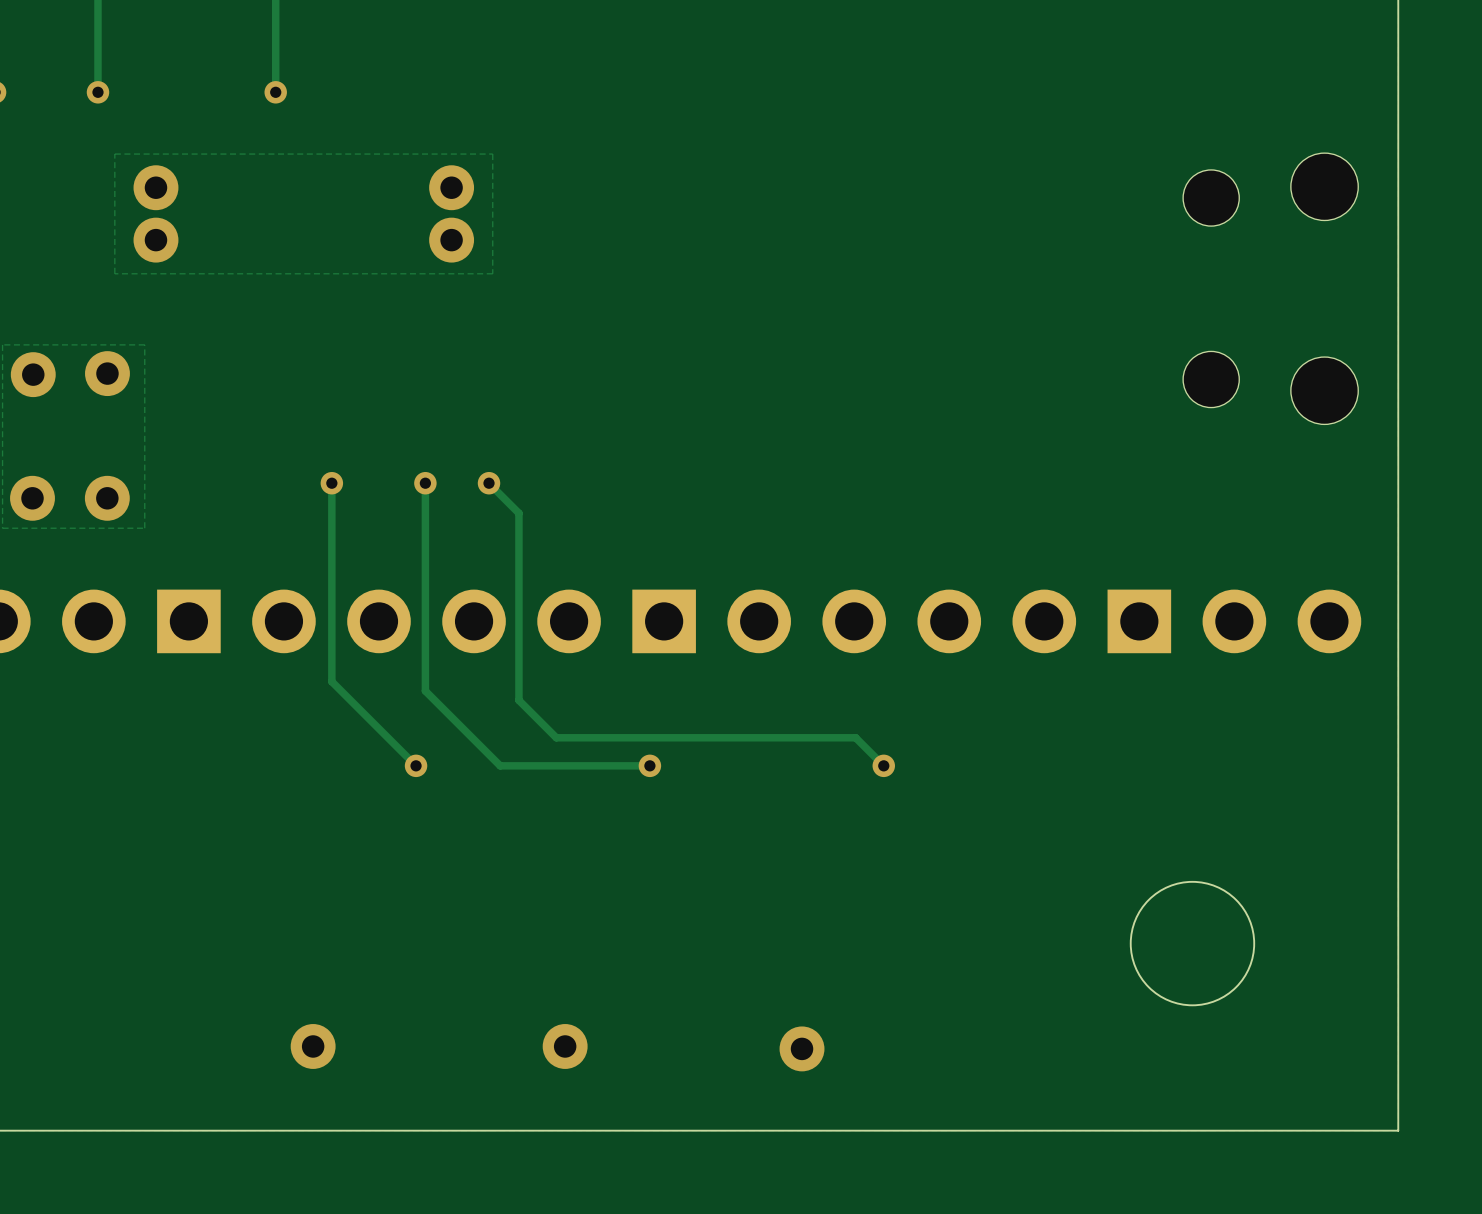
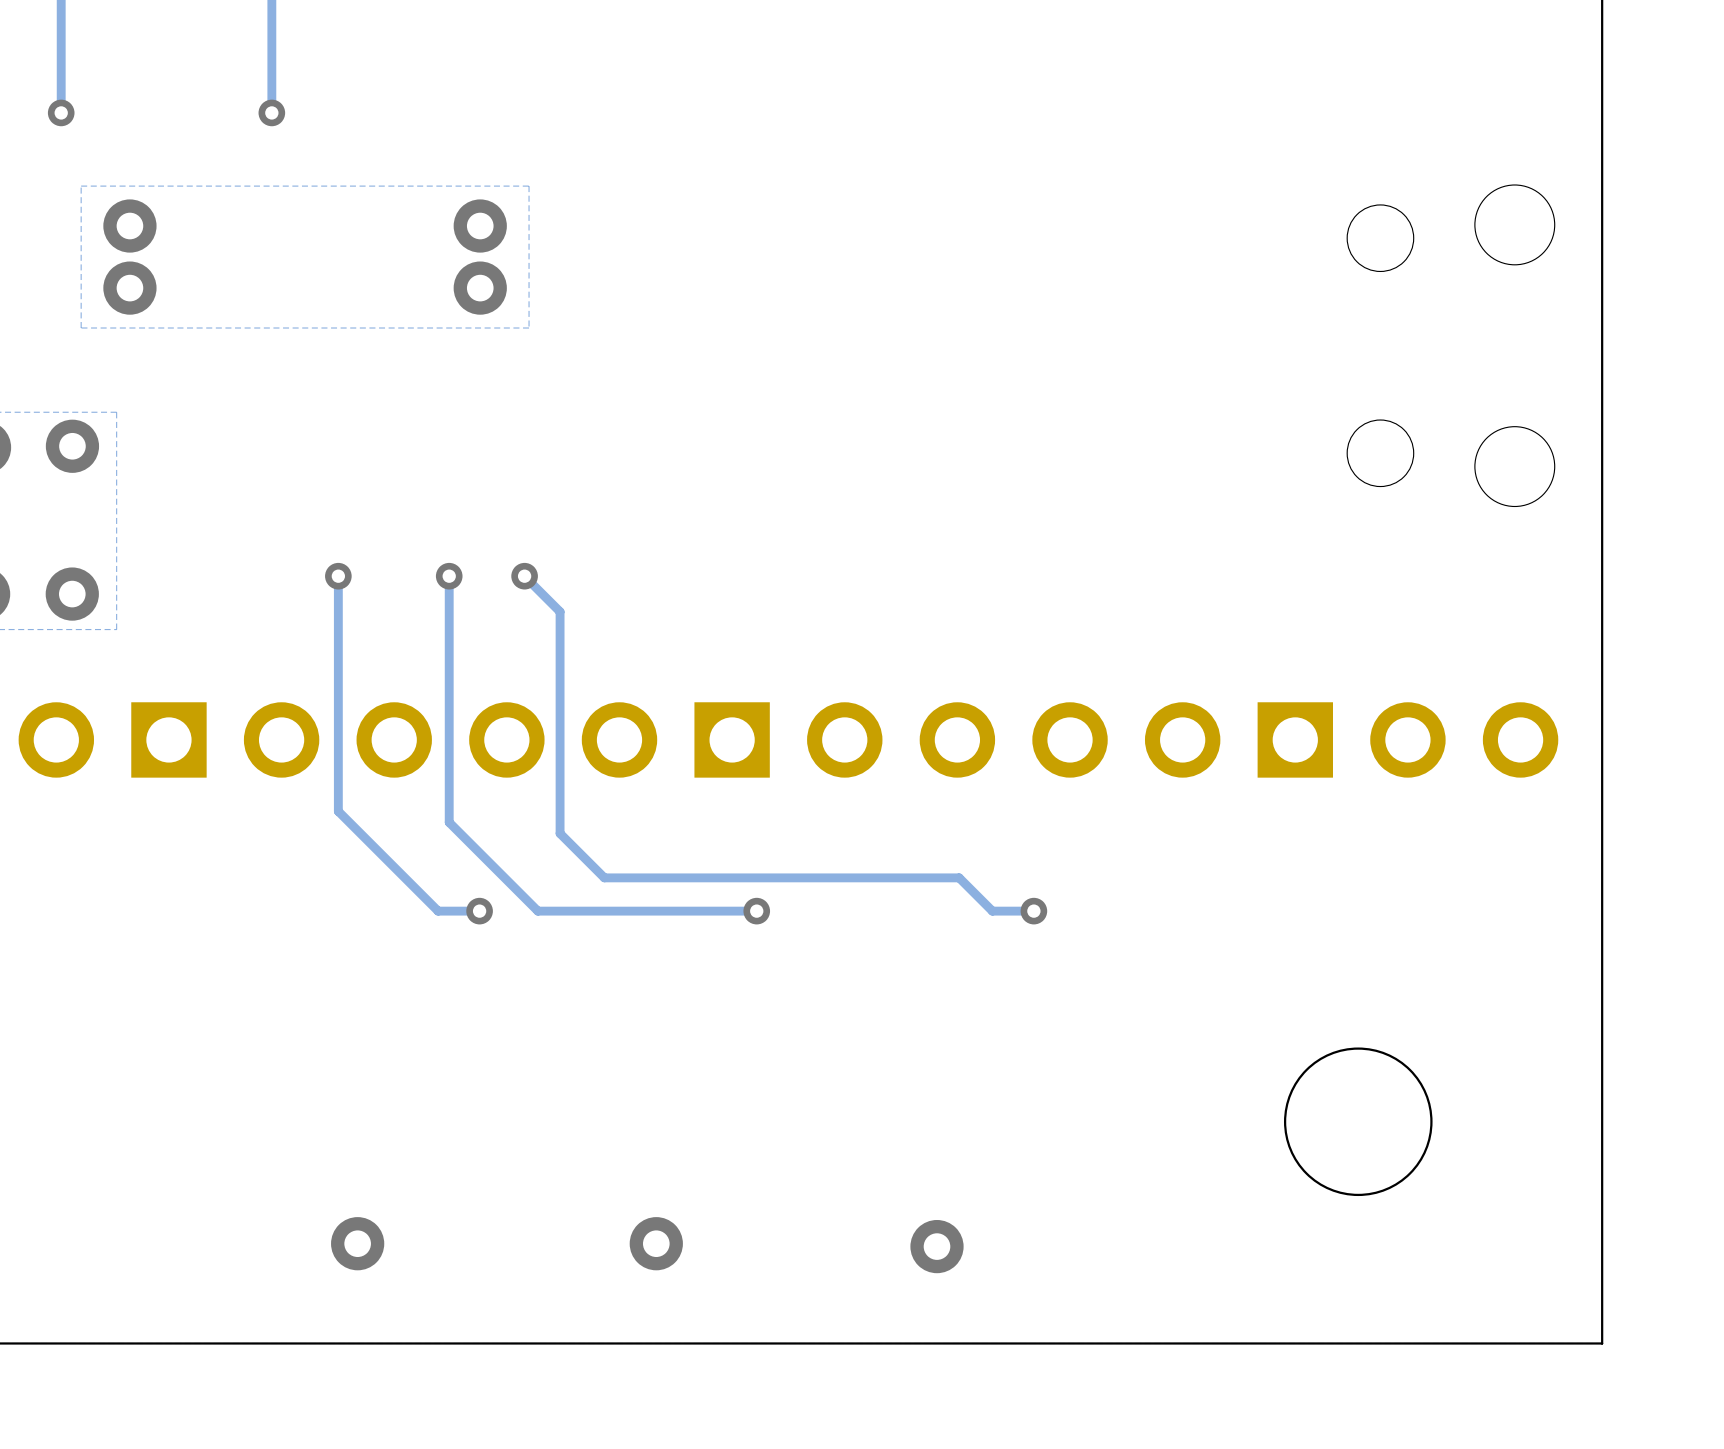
via position: (416, 765) -> (479, 911)
track: none -> (479, 911) (438, 911)
via position: (649, 765) -> (756, 911)
track: none -> (756, 911) (715, 911)
via position: (883, 765) -> (1033, 911)
track: none -> (1033, 911) (992, 911)
via position: (313, 1046) -> (357, 1243)
via position: (565, 1046) -> (656, 1243)
via position: (802, 1048) -> (937, 1246)

